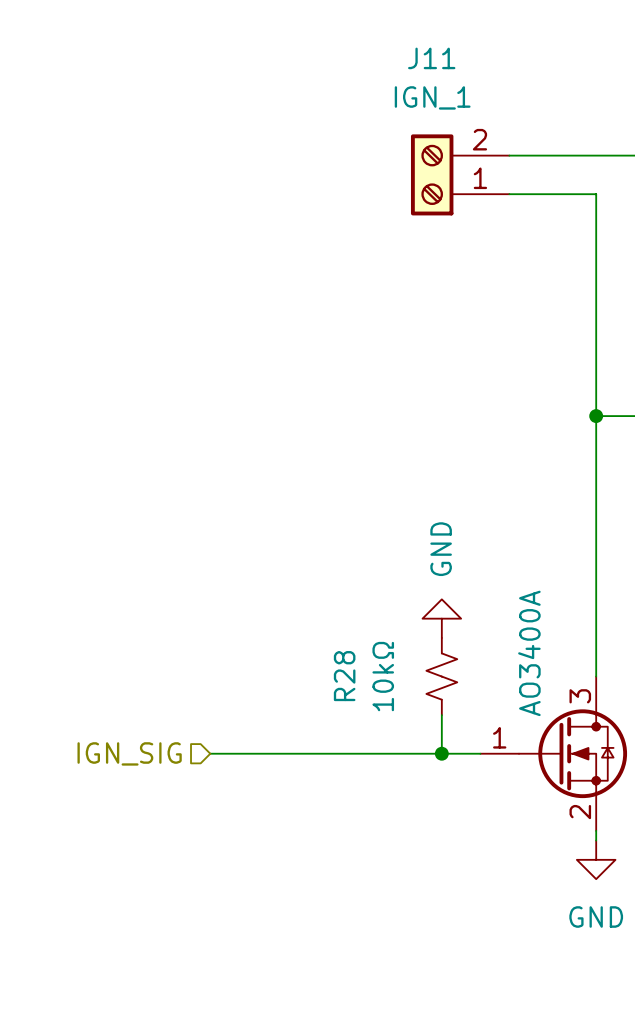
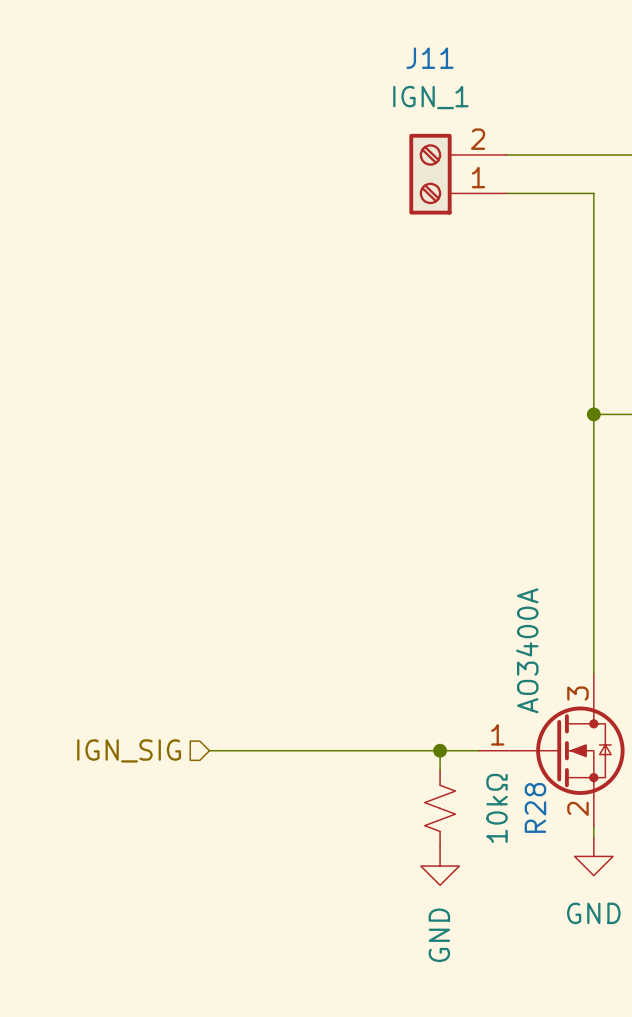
power symbol rotation: 0° (441, 618) -> 180° (440, 866)
power symbol position: GND (441, 618) -> GND (440, 866)
R28 name position: R28 (344, 676) -> R28 (535, 807)
R28 value position: 10kΩ (383, 676) -> 10kΩ (497, 808)
R28 position: (441, 676) -> (440, 808)
wire: (441, 715) (441, 753) -> (440, 769) (440, 750)

